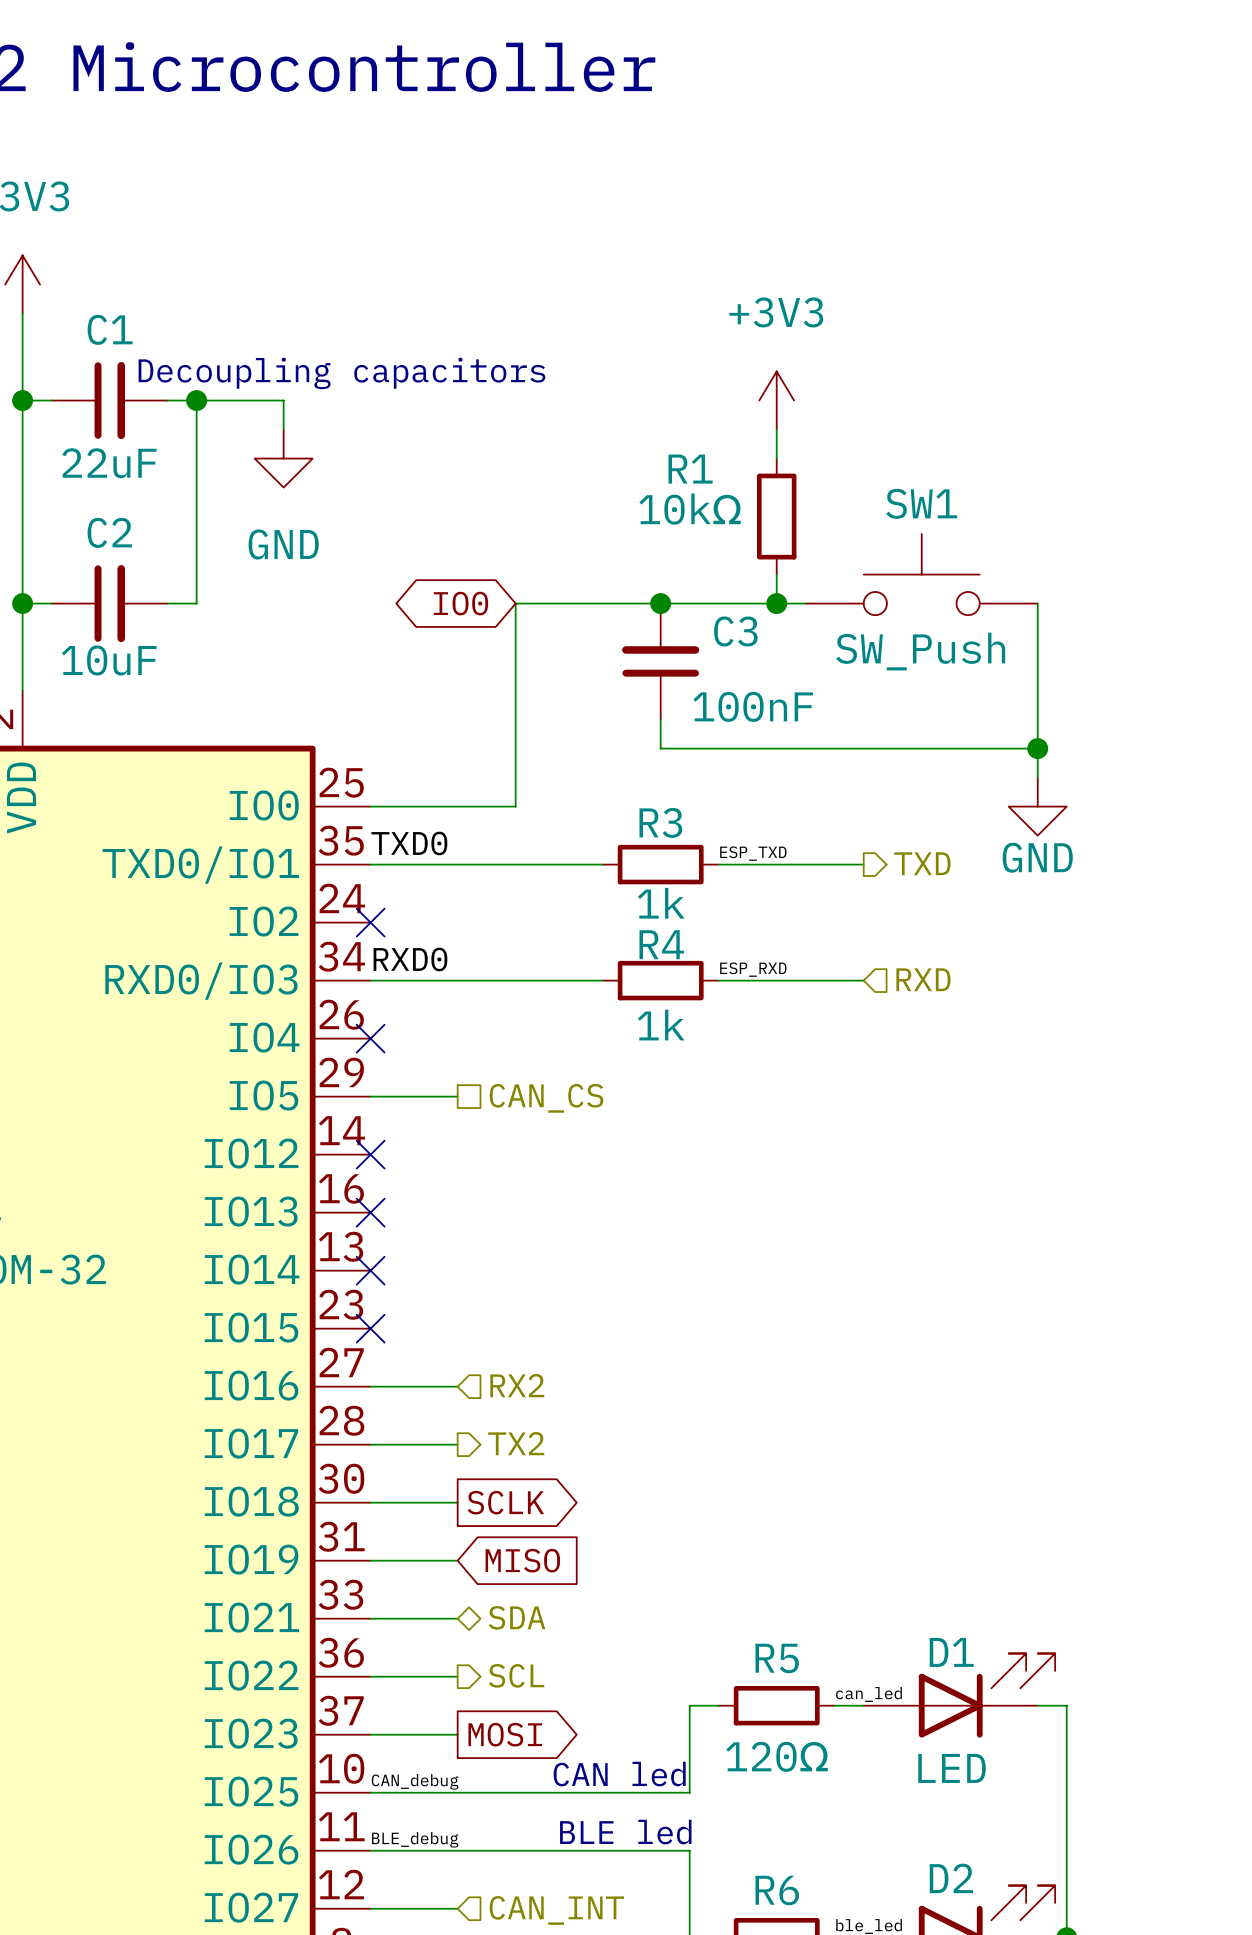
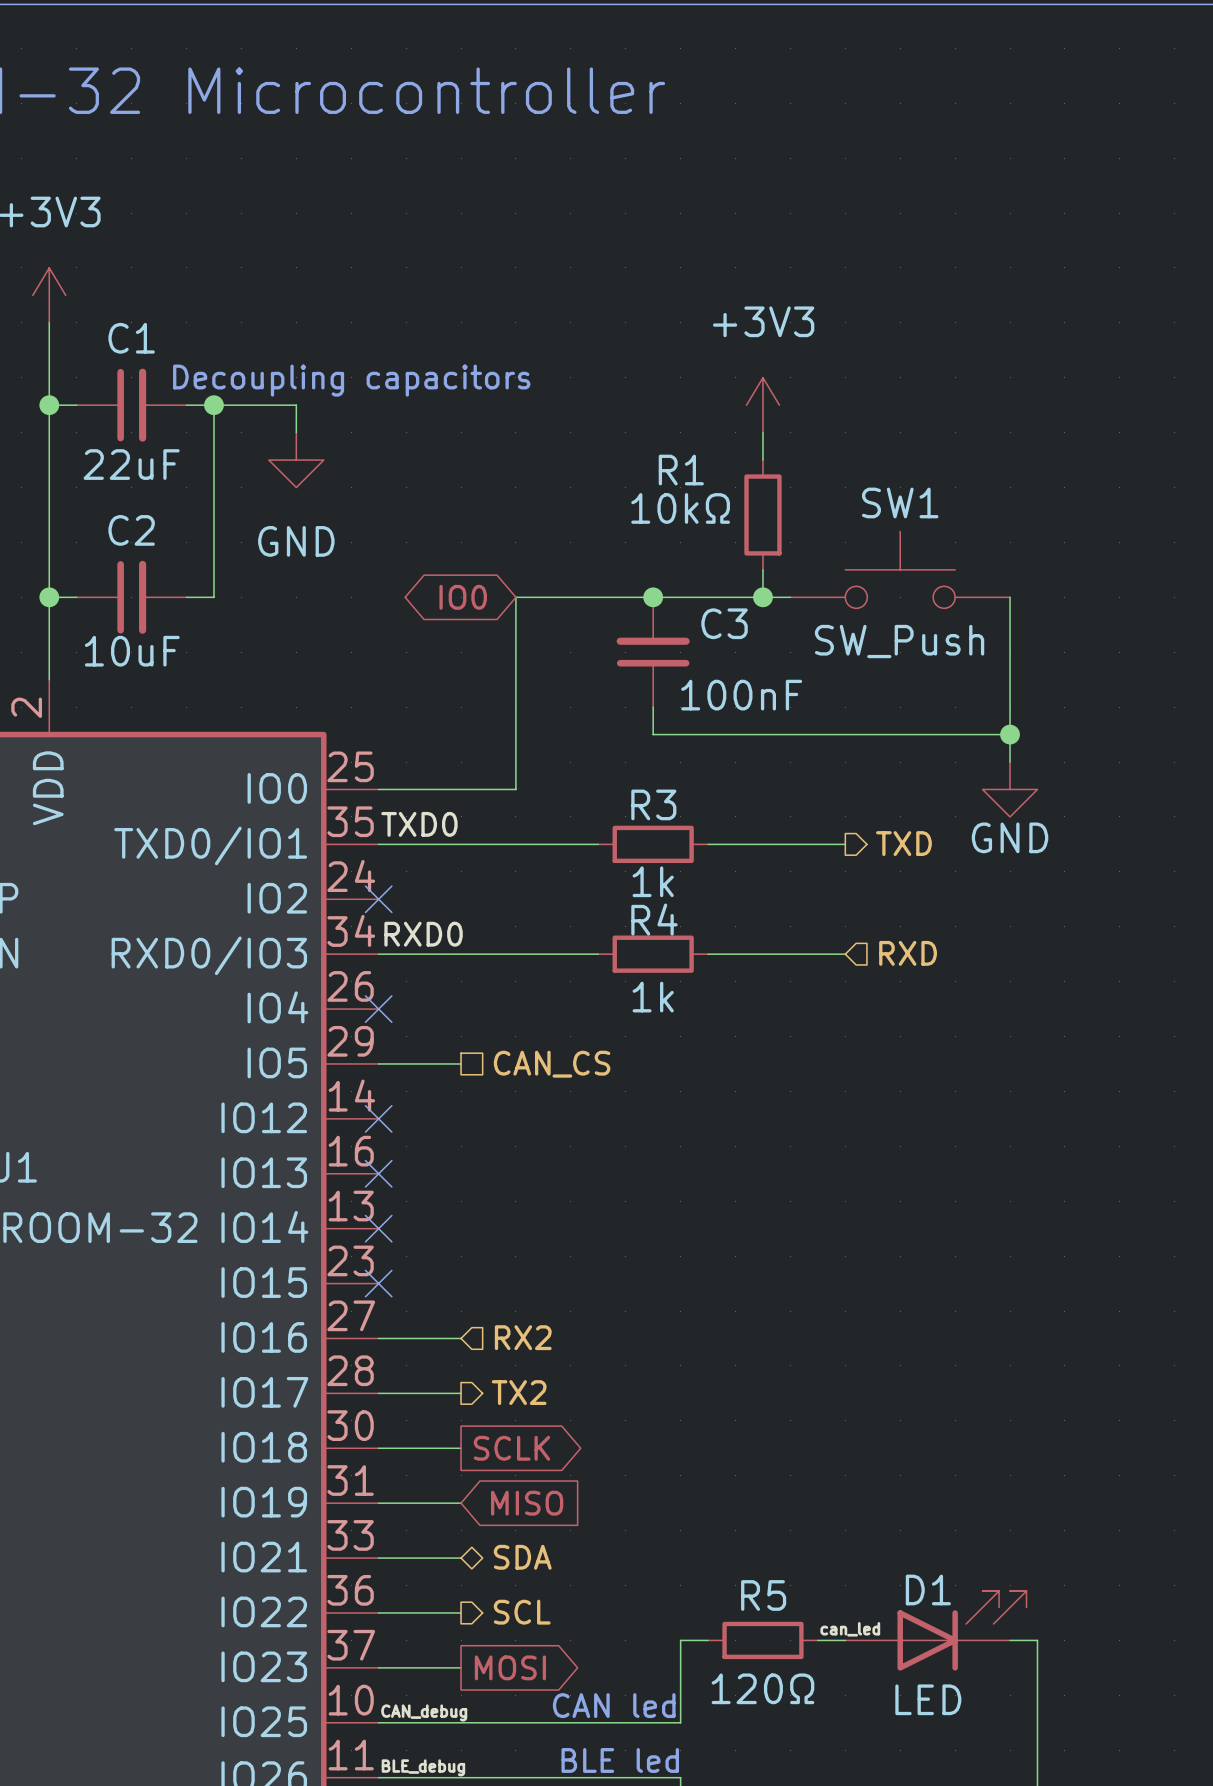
label: ESP_TXD (753, 853) -> none
label: ESP_RXD (753, 969) -> none

